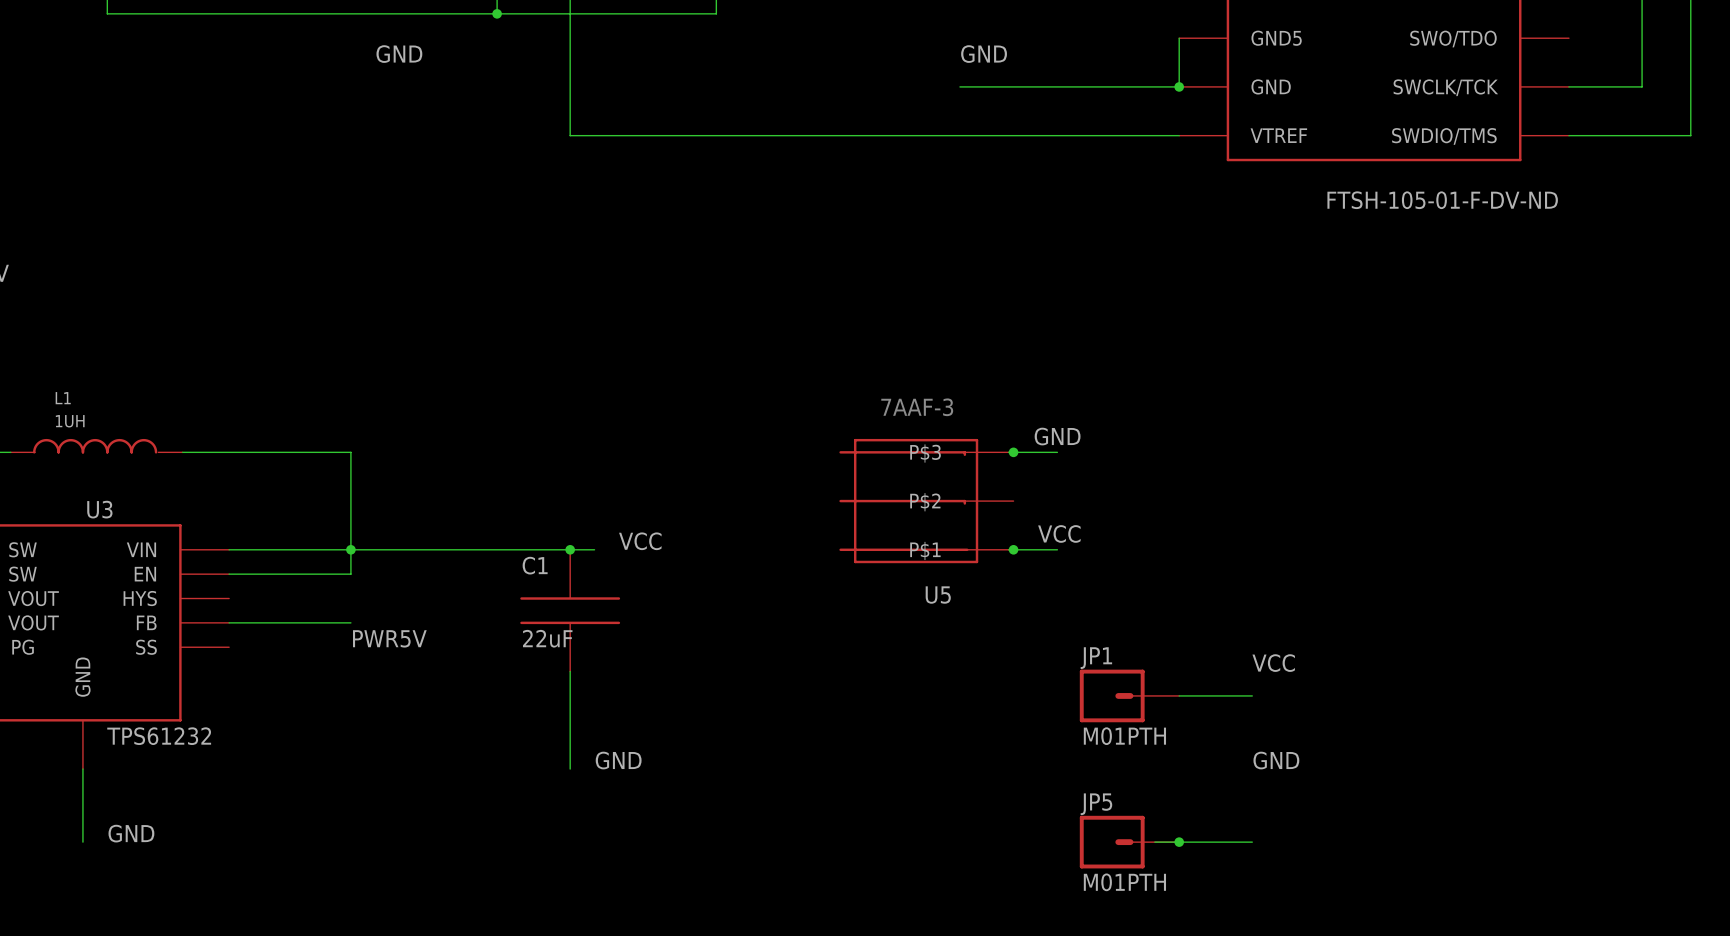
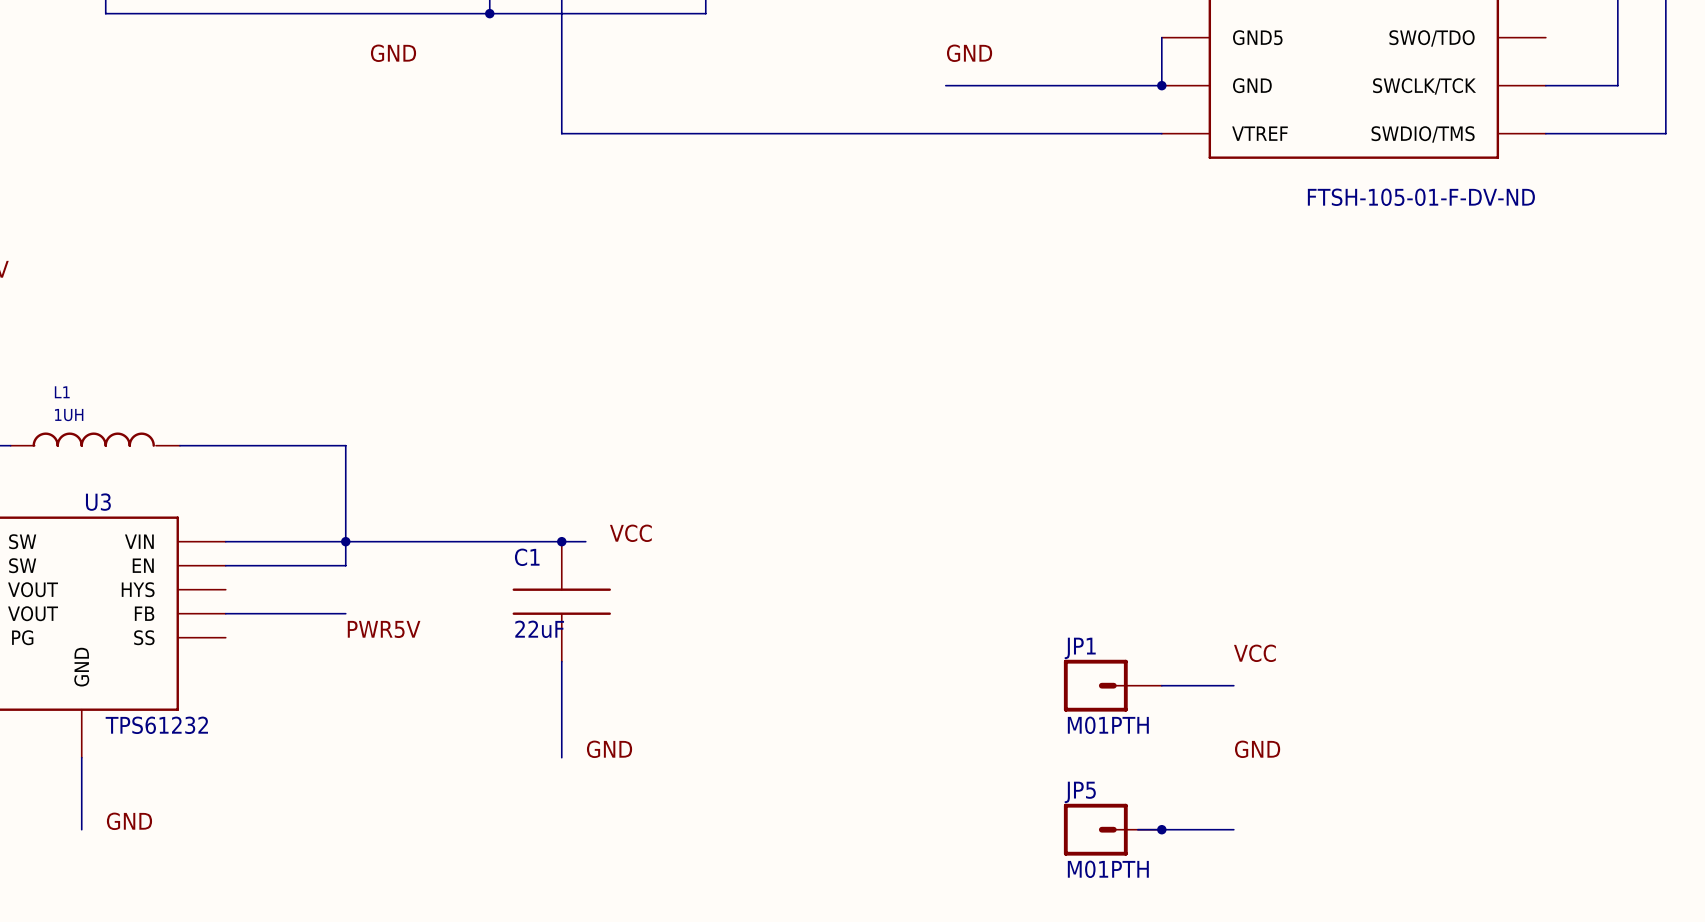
label: GND (1057, 436) -> none
wire: (1008, 452) (1057, 452) -> none
junction: (1013, 452) -> none
U5: 7AAF-3 (926, 501) -> none
label: VCC (1059, 533) -> none
wire: (1008, 549) (1057, 549) -> none
junction: (1013, 549) -> none

